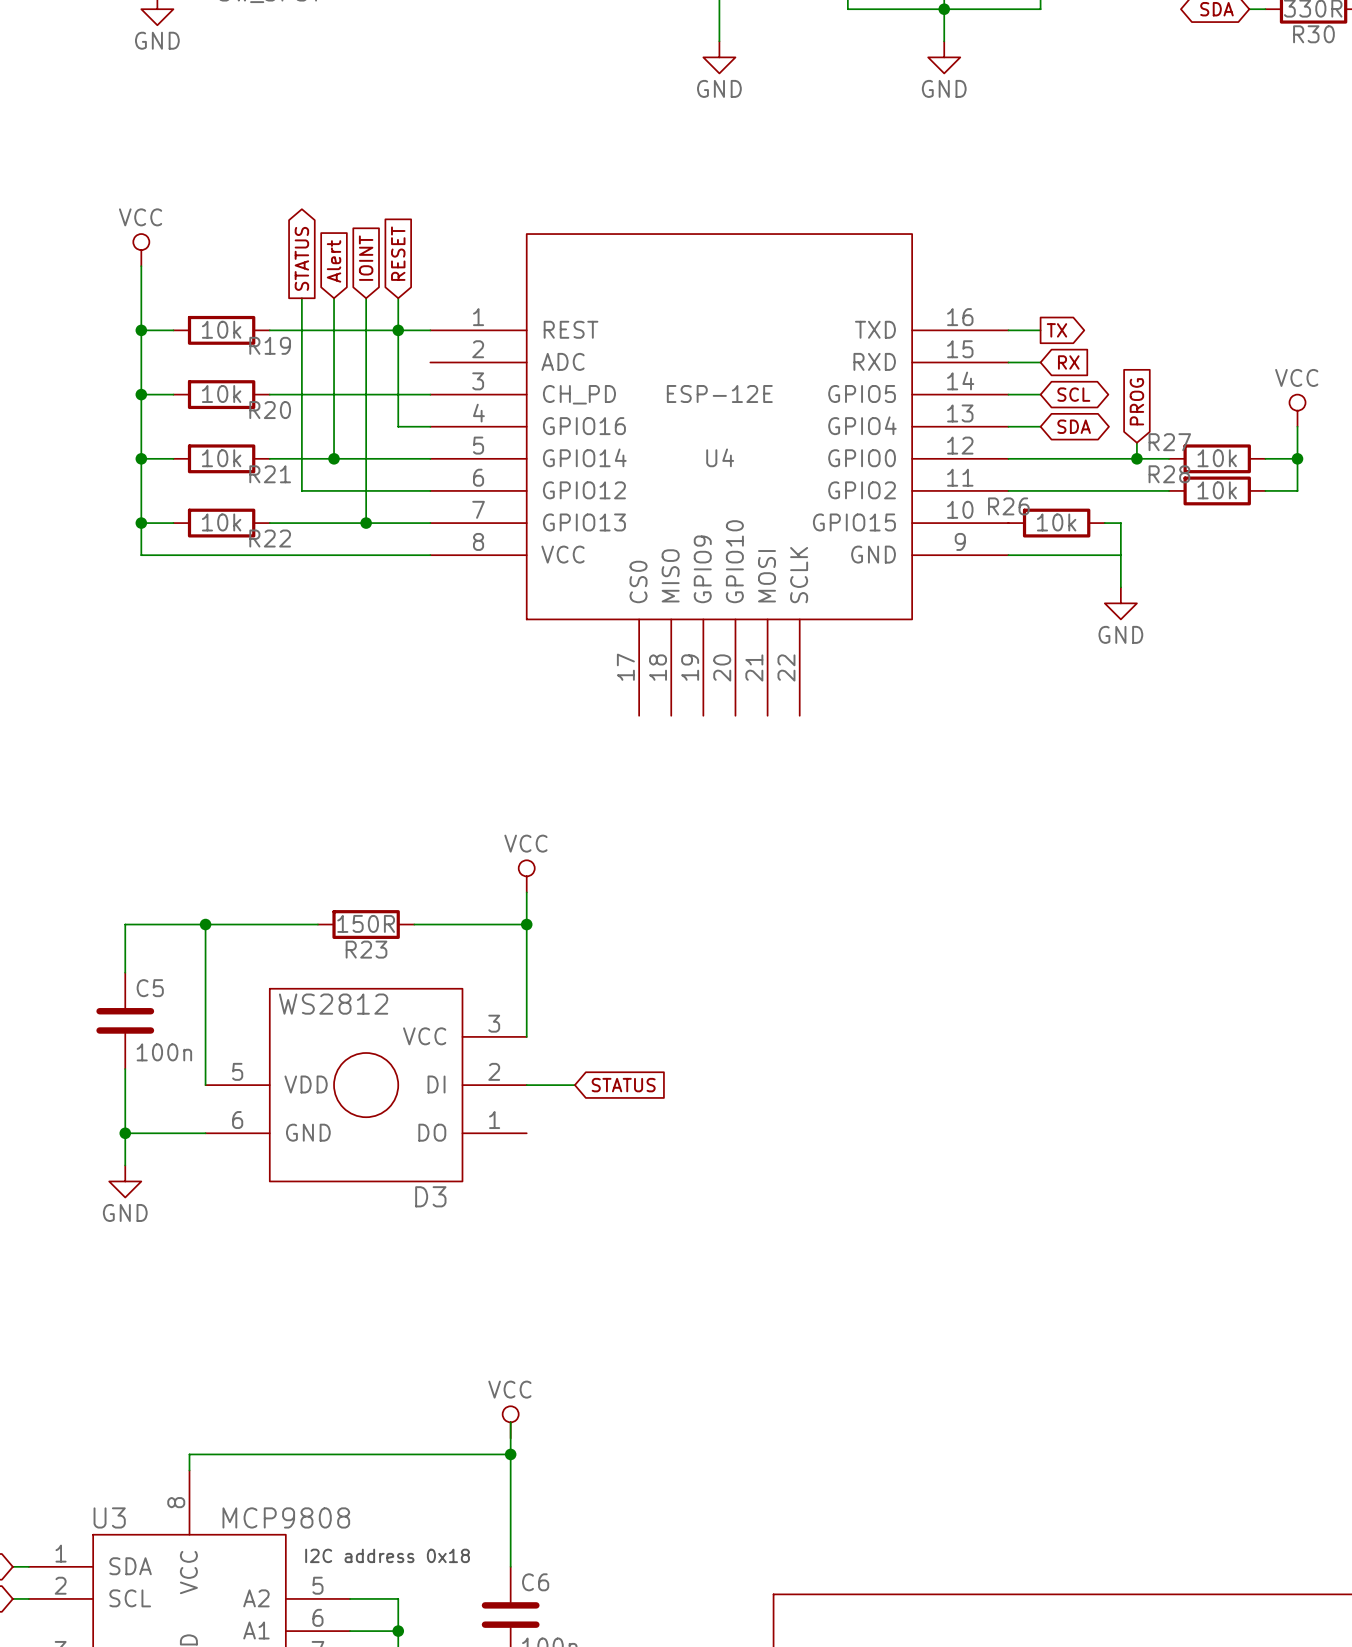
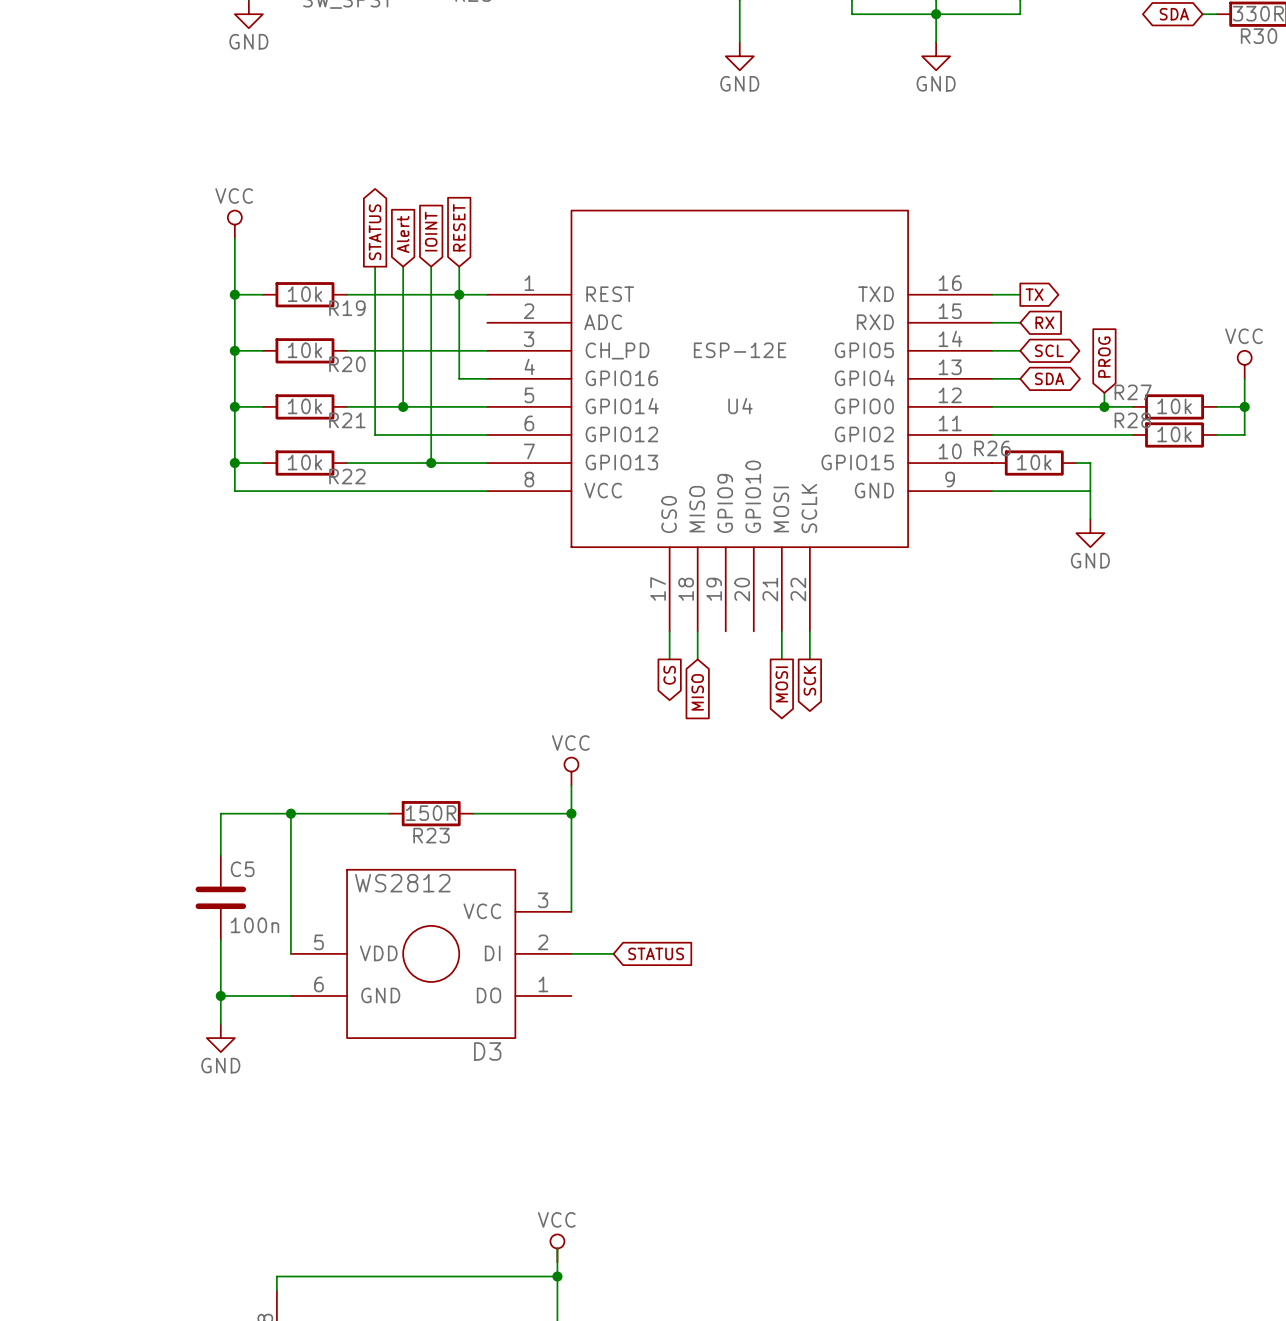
wire: none -> (669, 631) (669, 659)
wire: none -> (697, 631) (697, 659)
wire: none -> (781, 631) (781, 659)
wire: none -> (809, 631) (809, 659)
global label: none -> CS (669, 675)
global label: none -> SCK (809, 680)
global label: none -> MOSI (781, 684)
global label: none -> MISO (697, 692)

